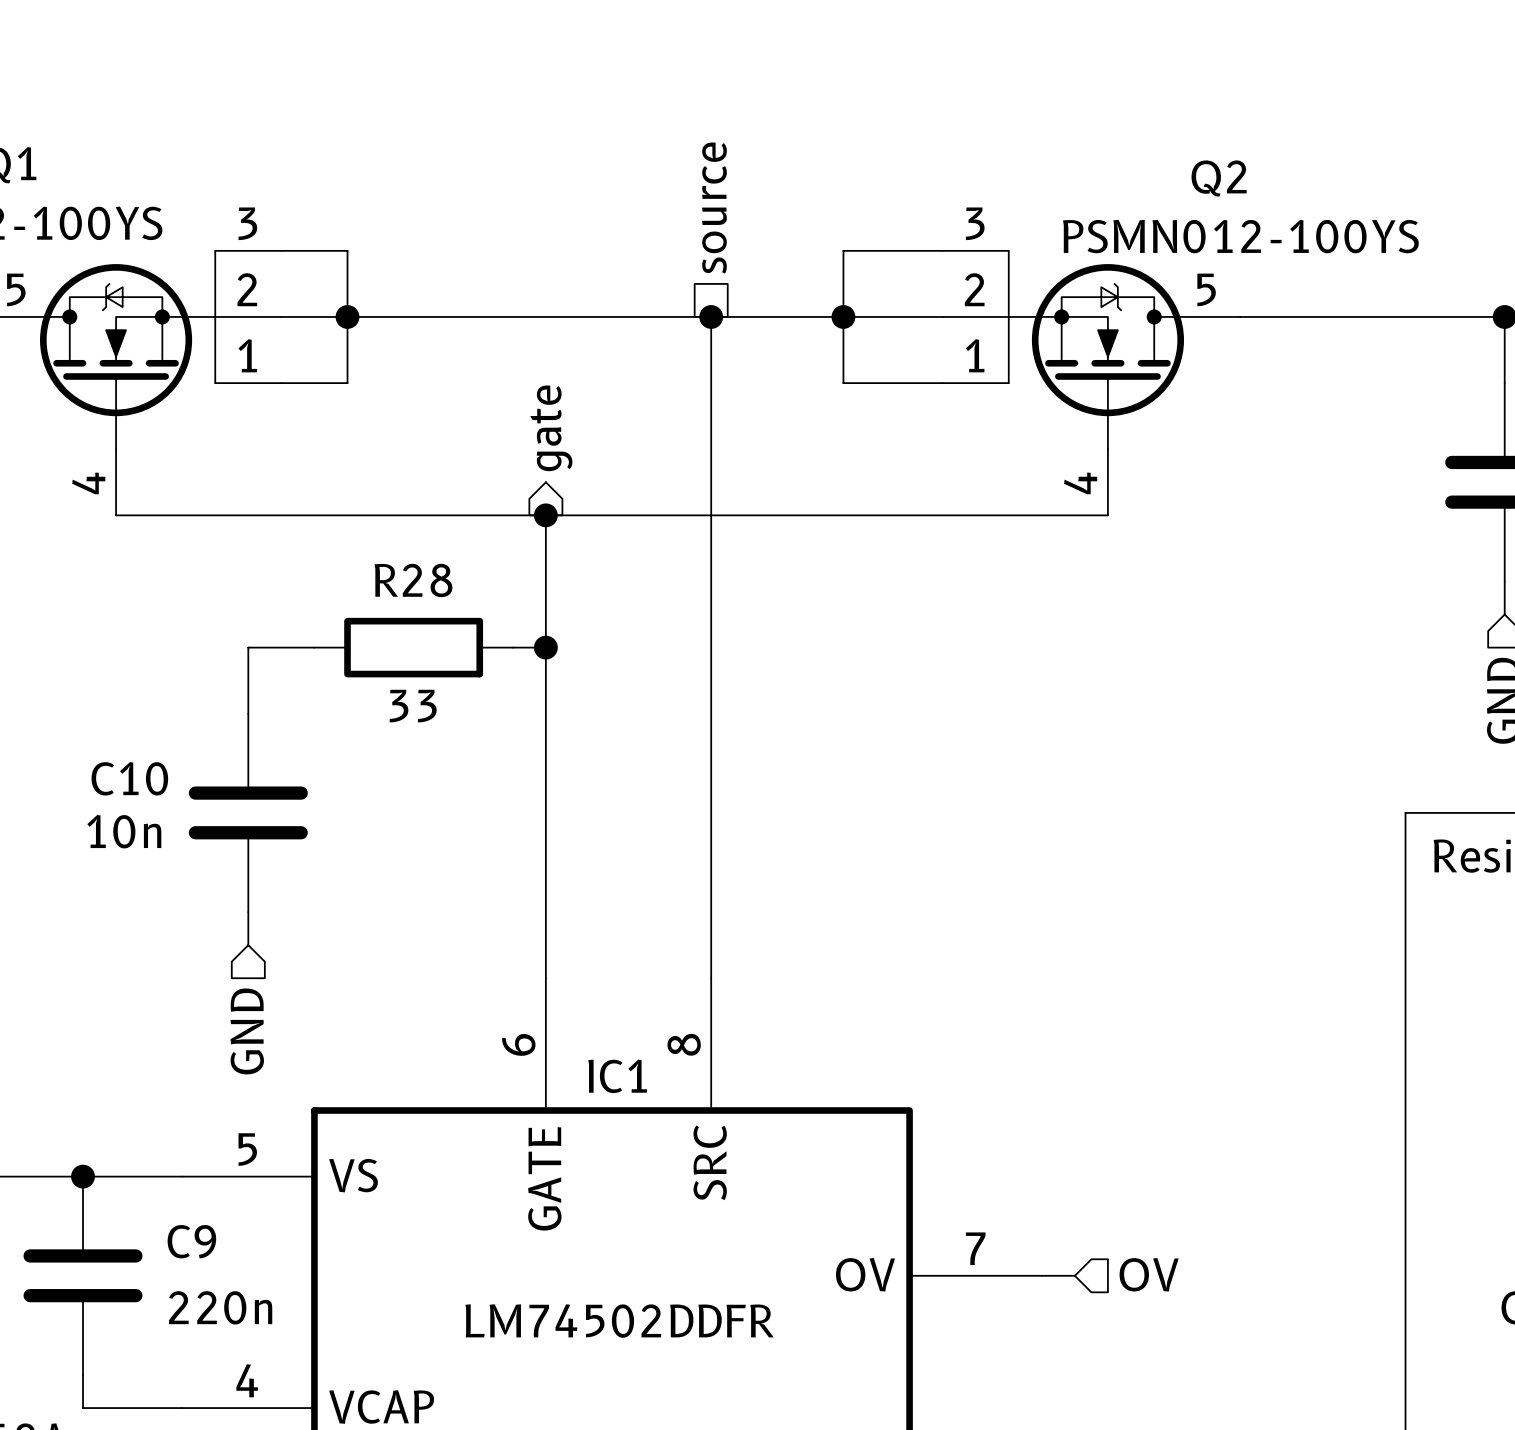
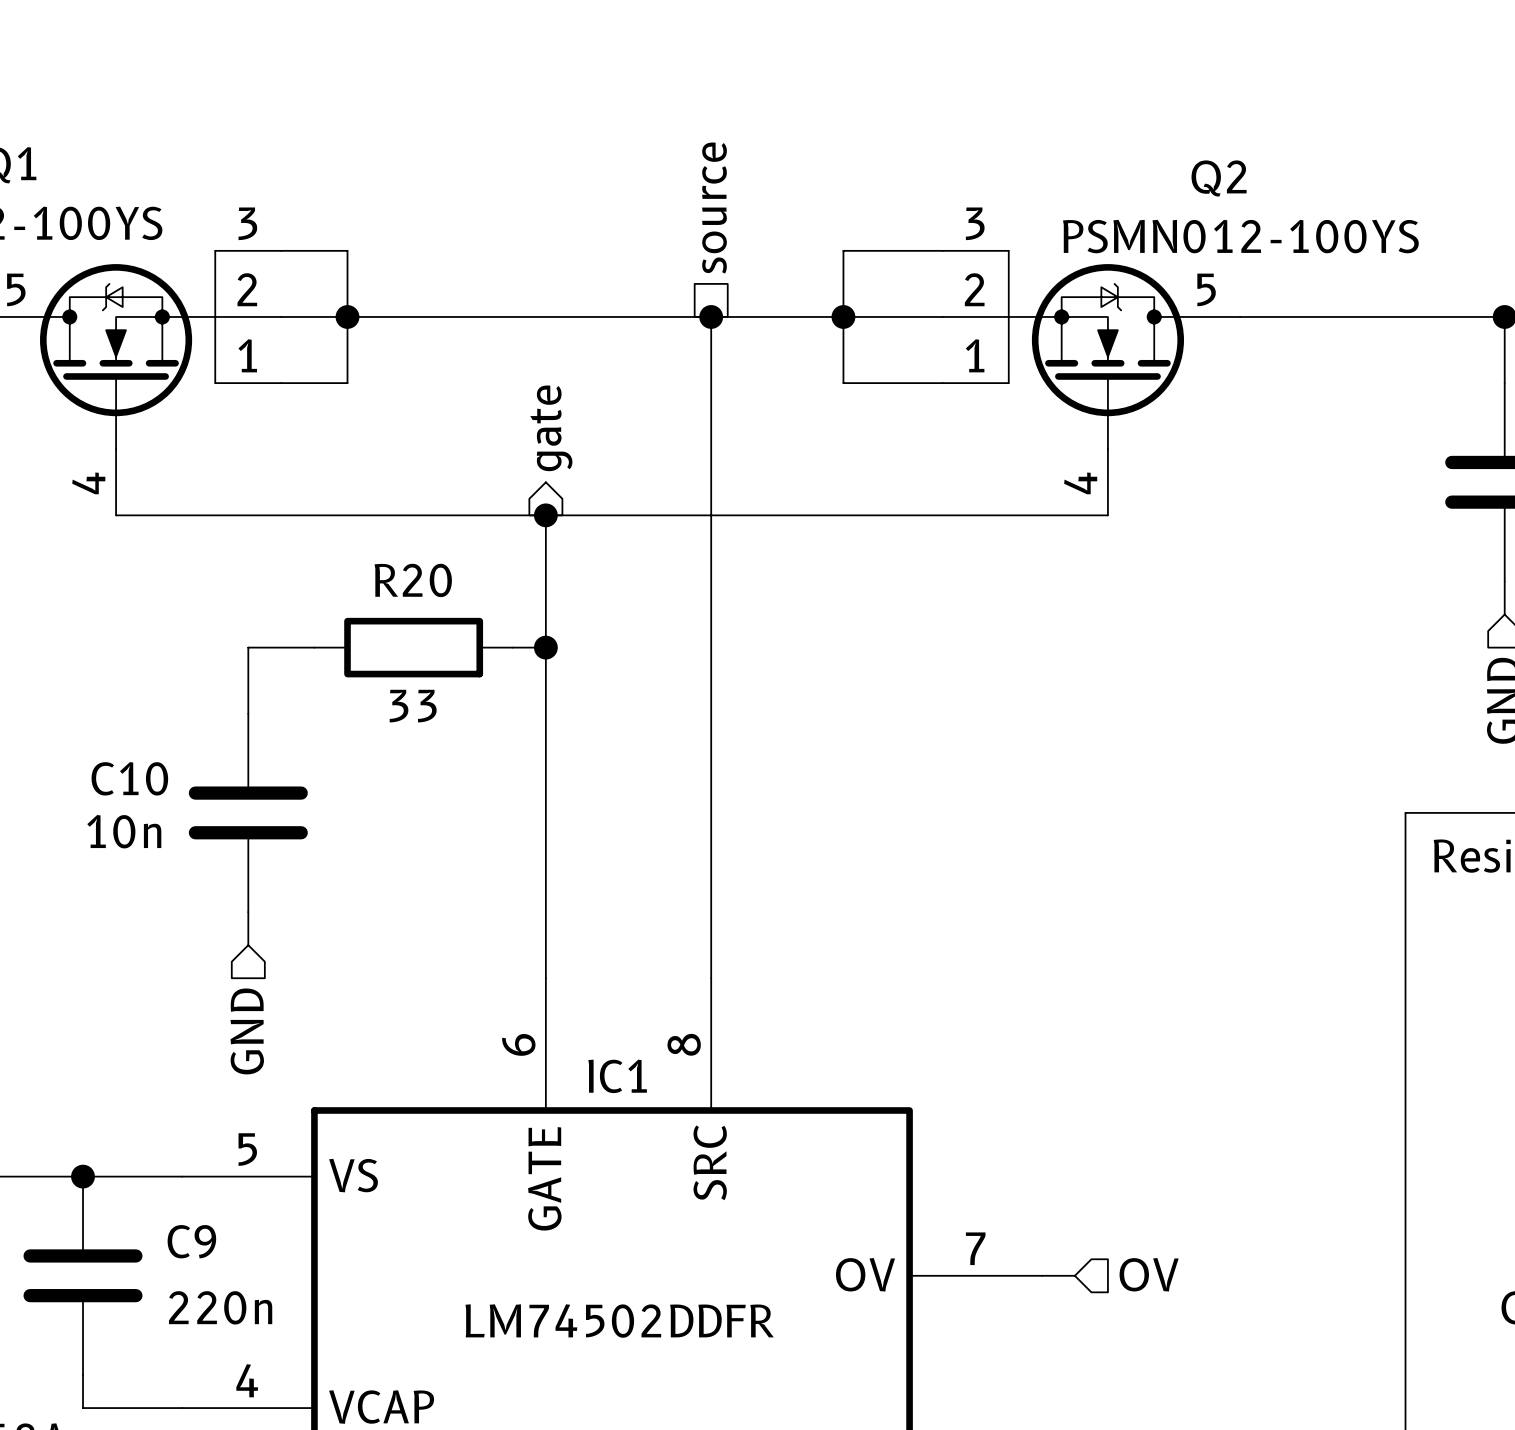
R28 name: R28 (413, 580) -> R20 (413, 580)

